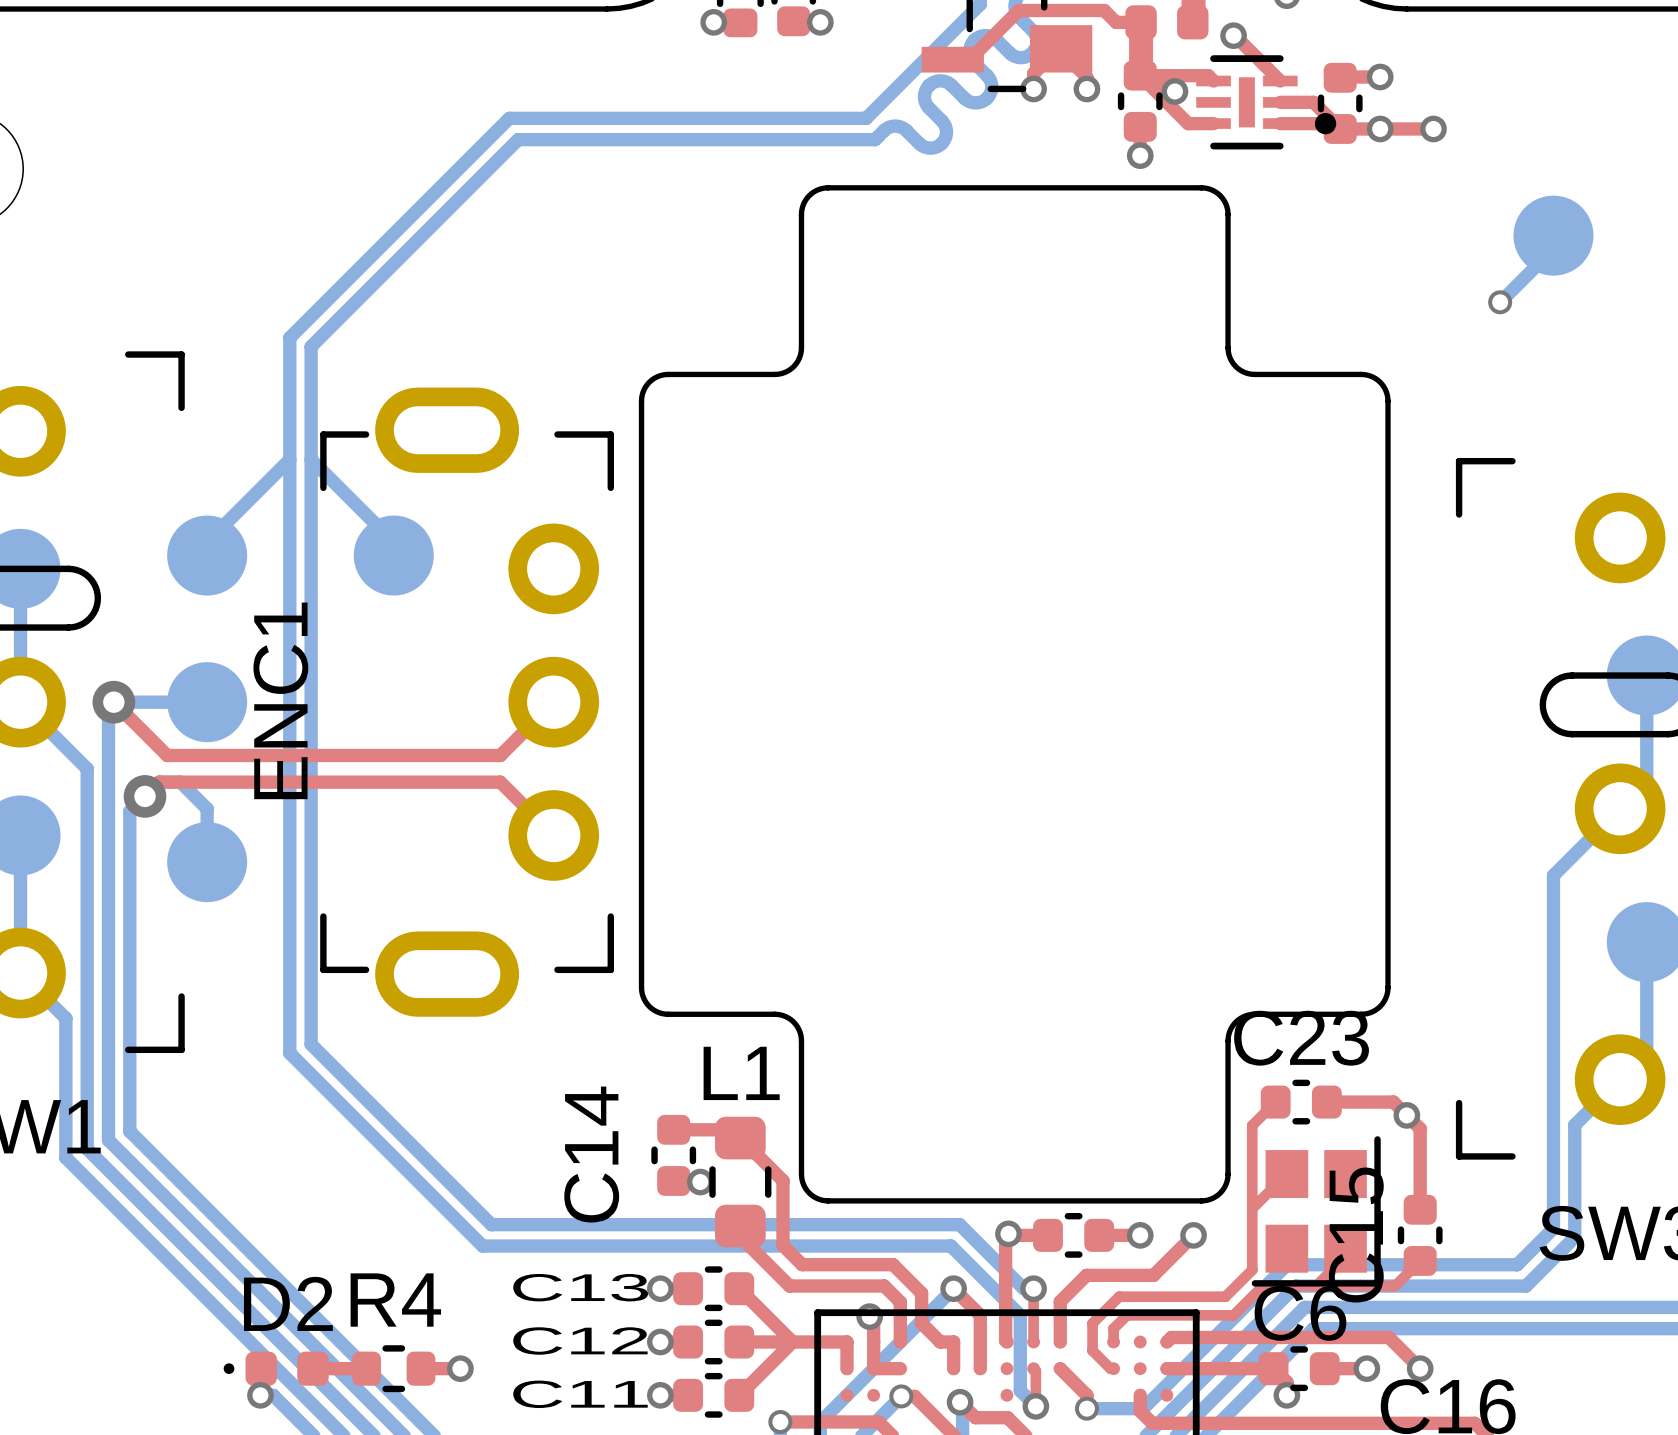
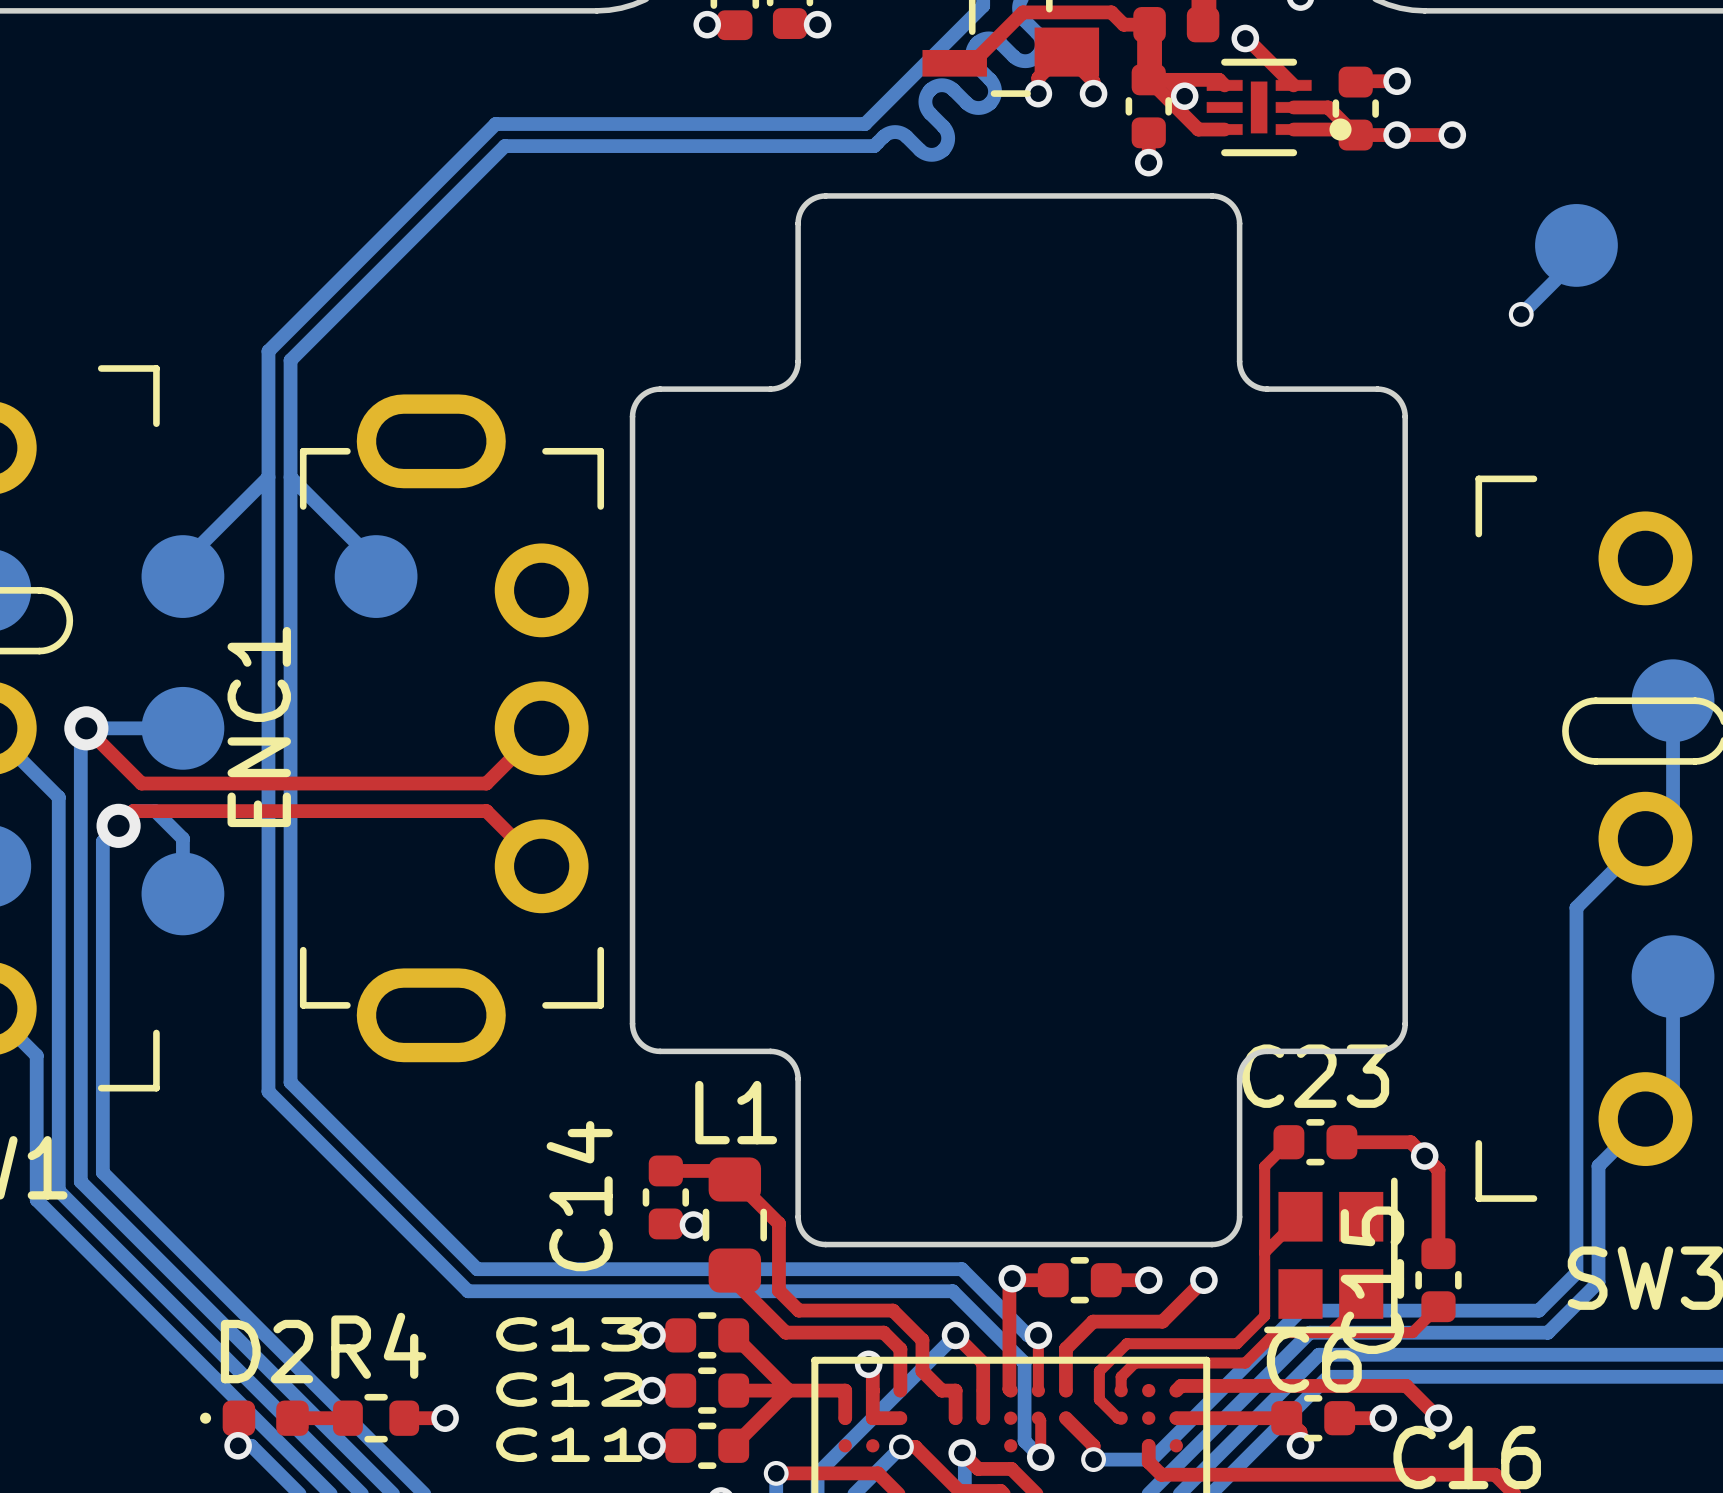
ENC1 footprint: [320, 387, 614, 1017] -> [299, 394, 605, 1063]

